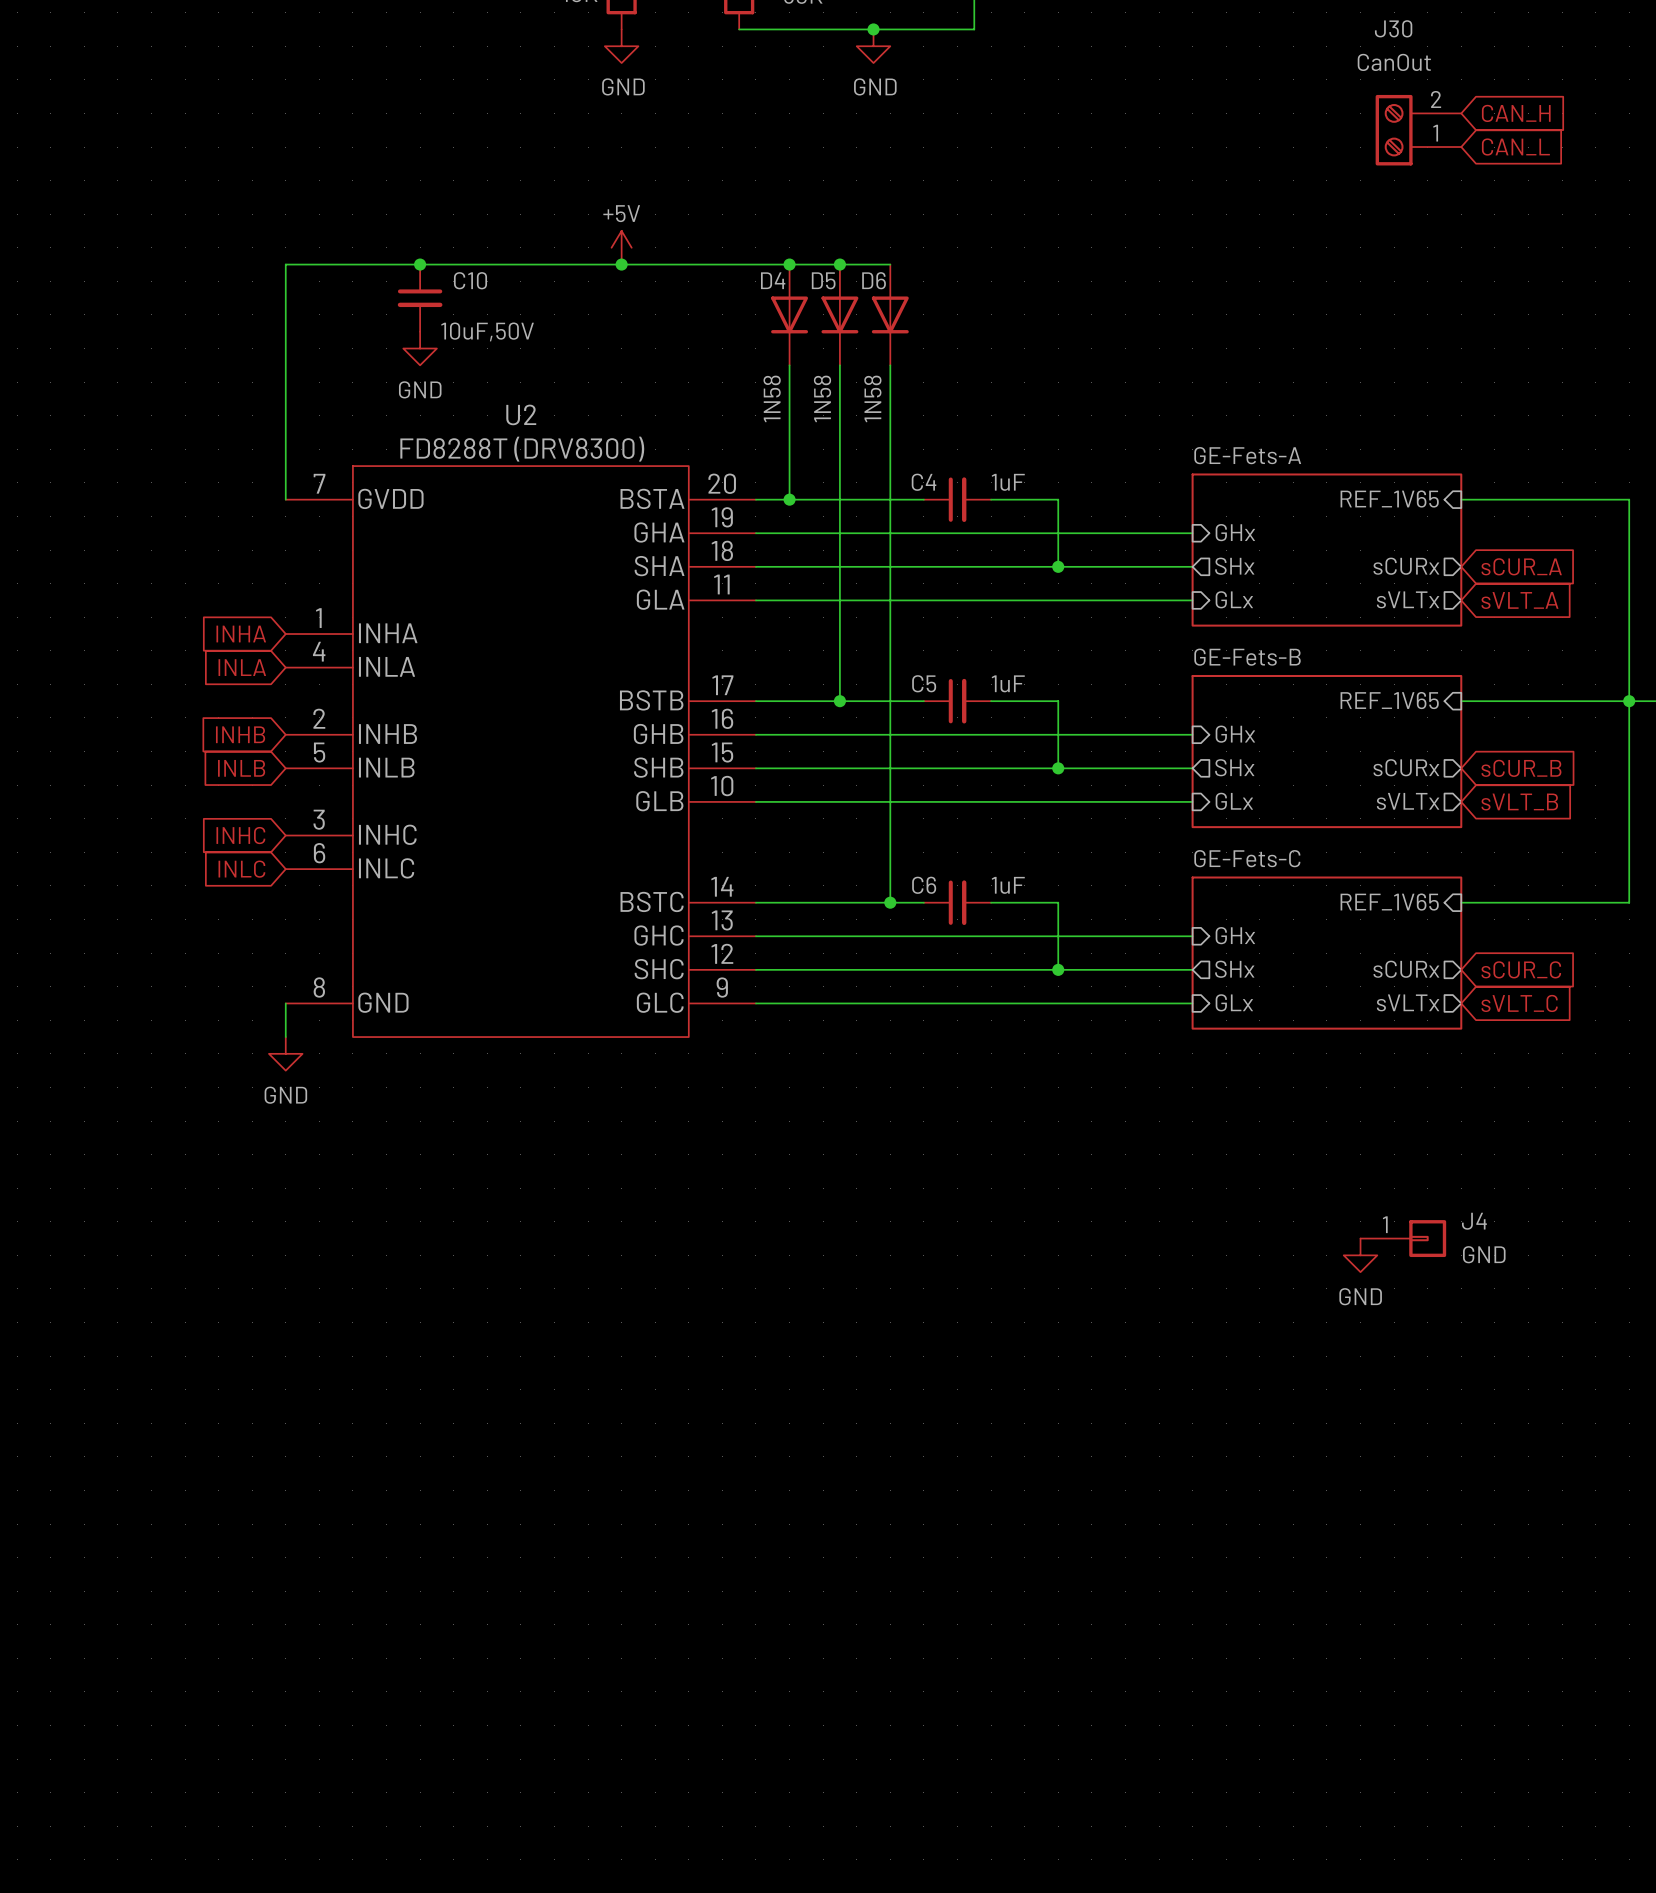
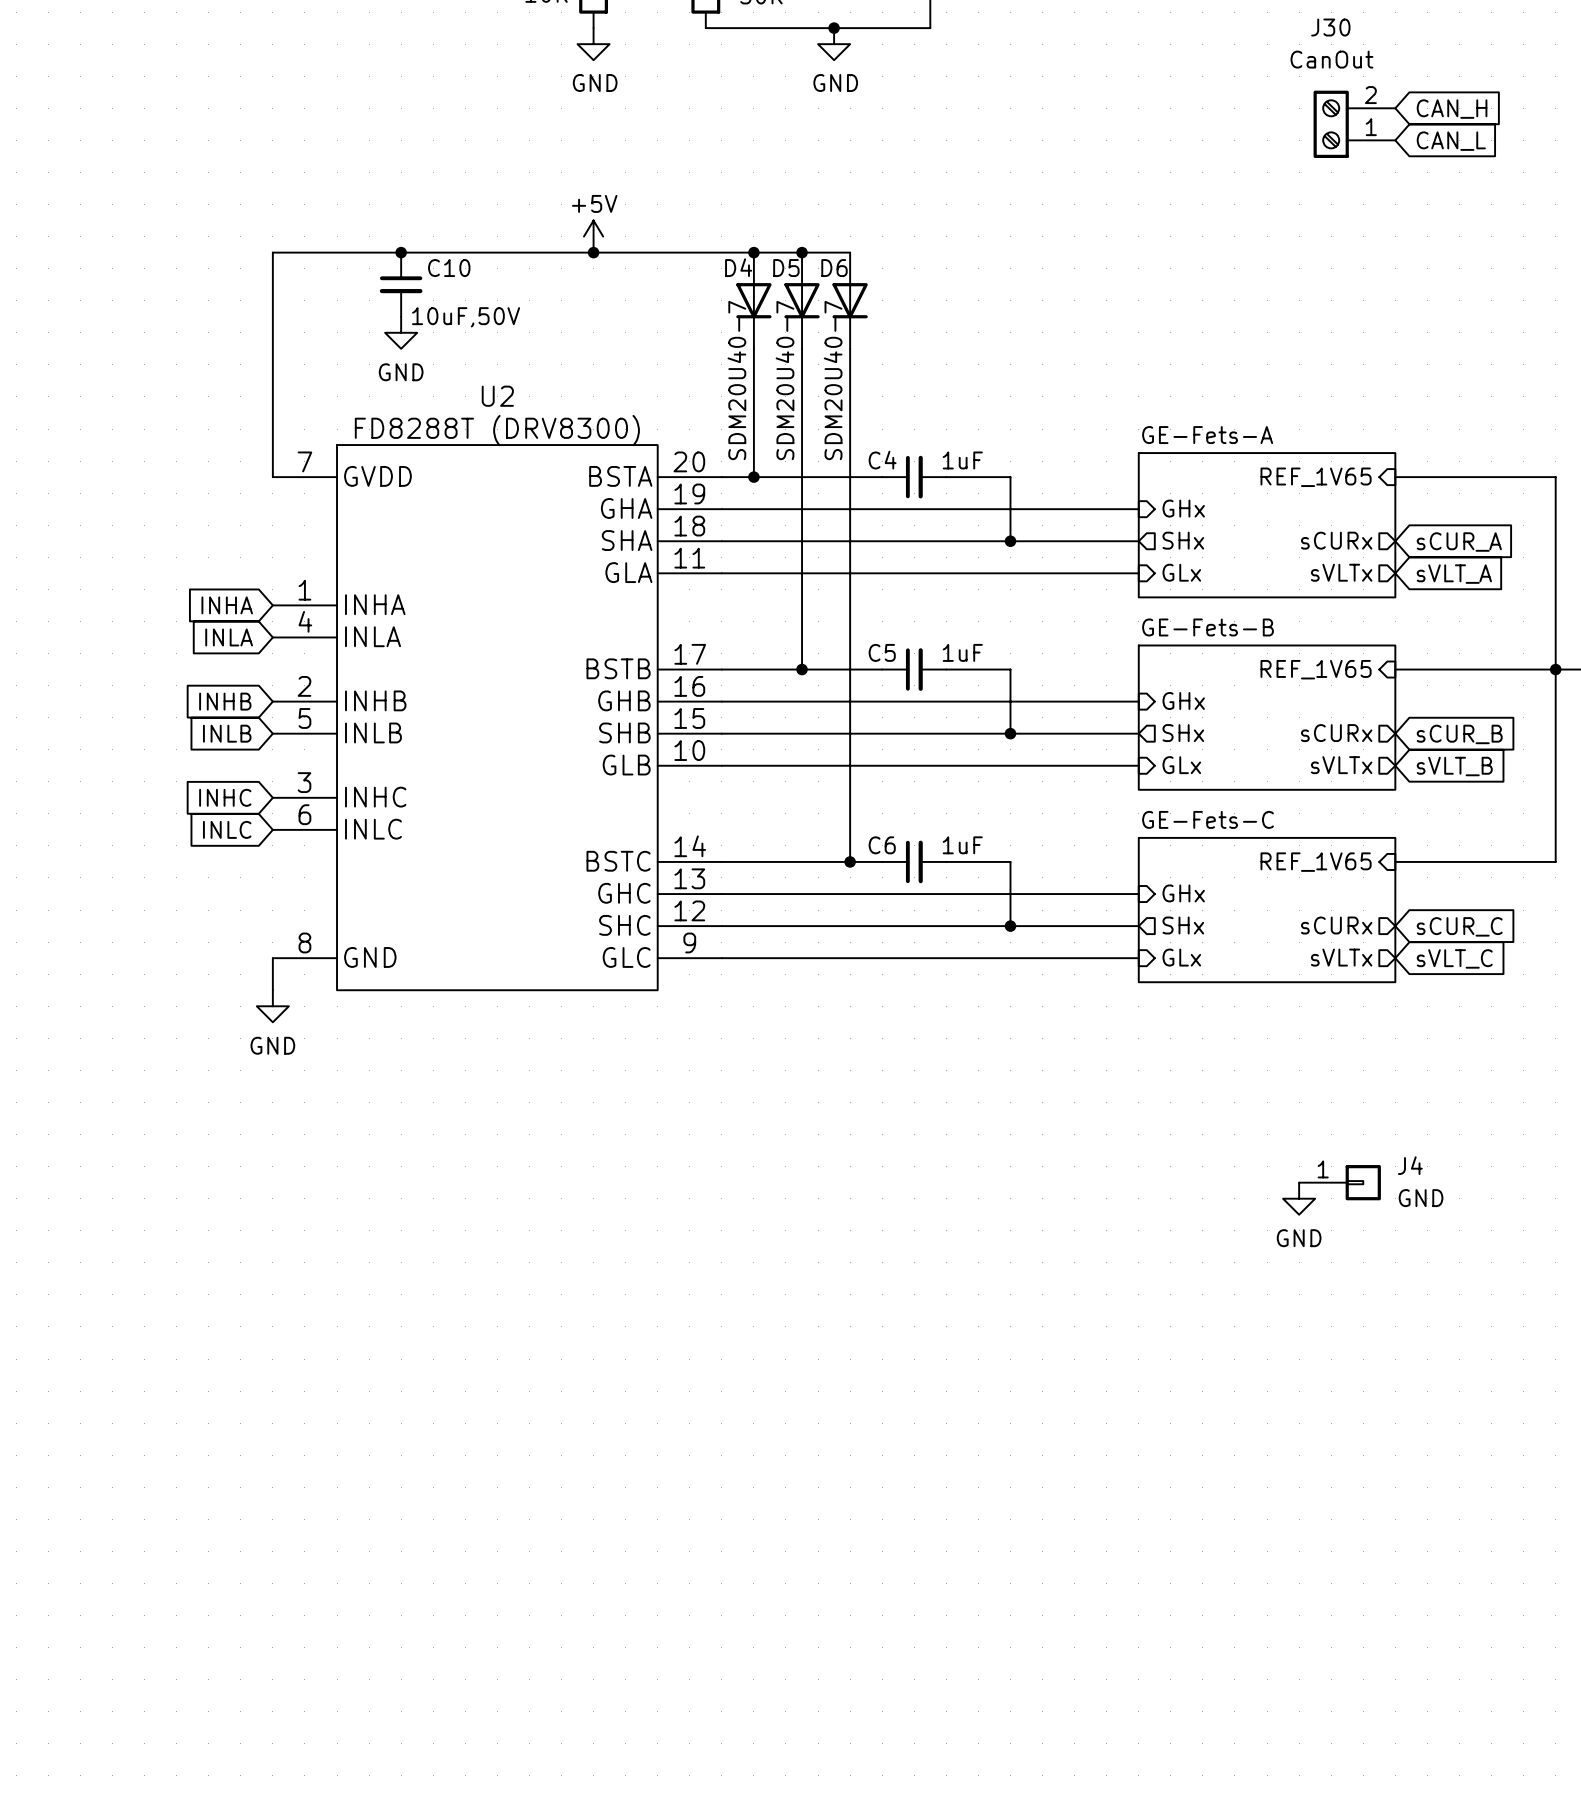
D4 value: 1N58 (772, 398) -> SDM20U40-7 (736, 380)
D5 value: 1N58 (822, 398) -> SDM20U40-7 (785, 380)
D6 value: 1N58 (872, 398) -> SDM20U40-7 (833, 380)

